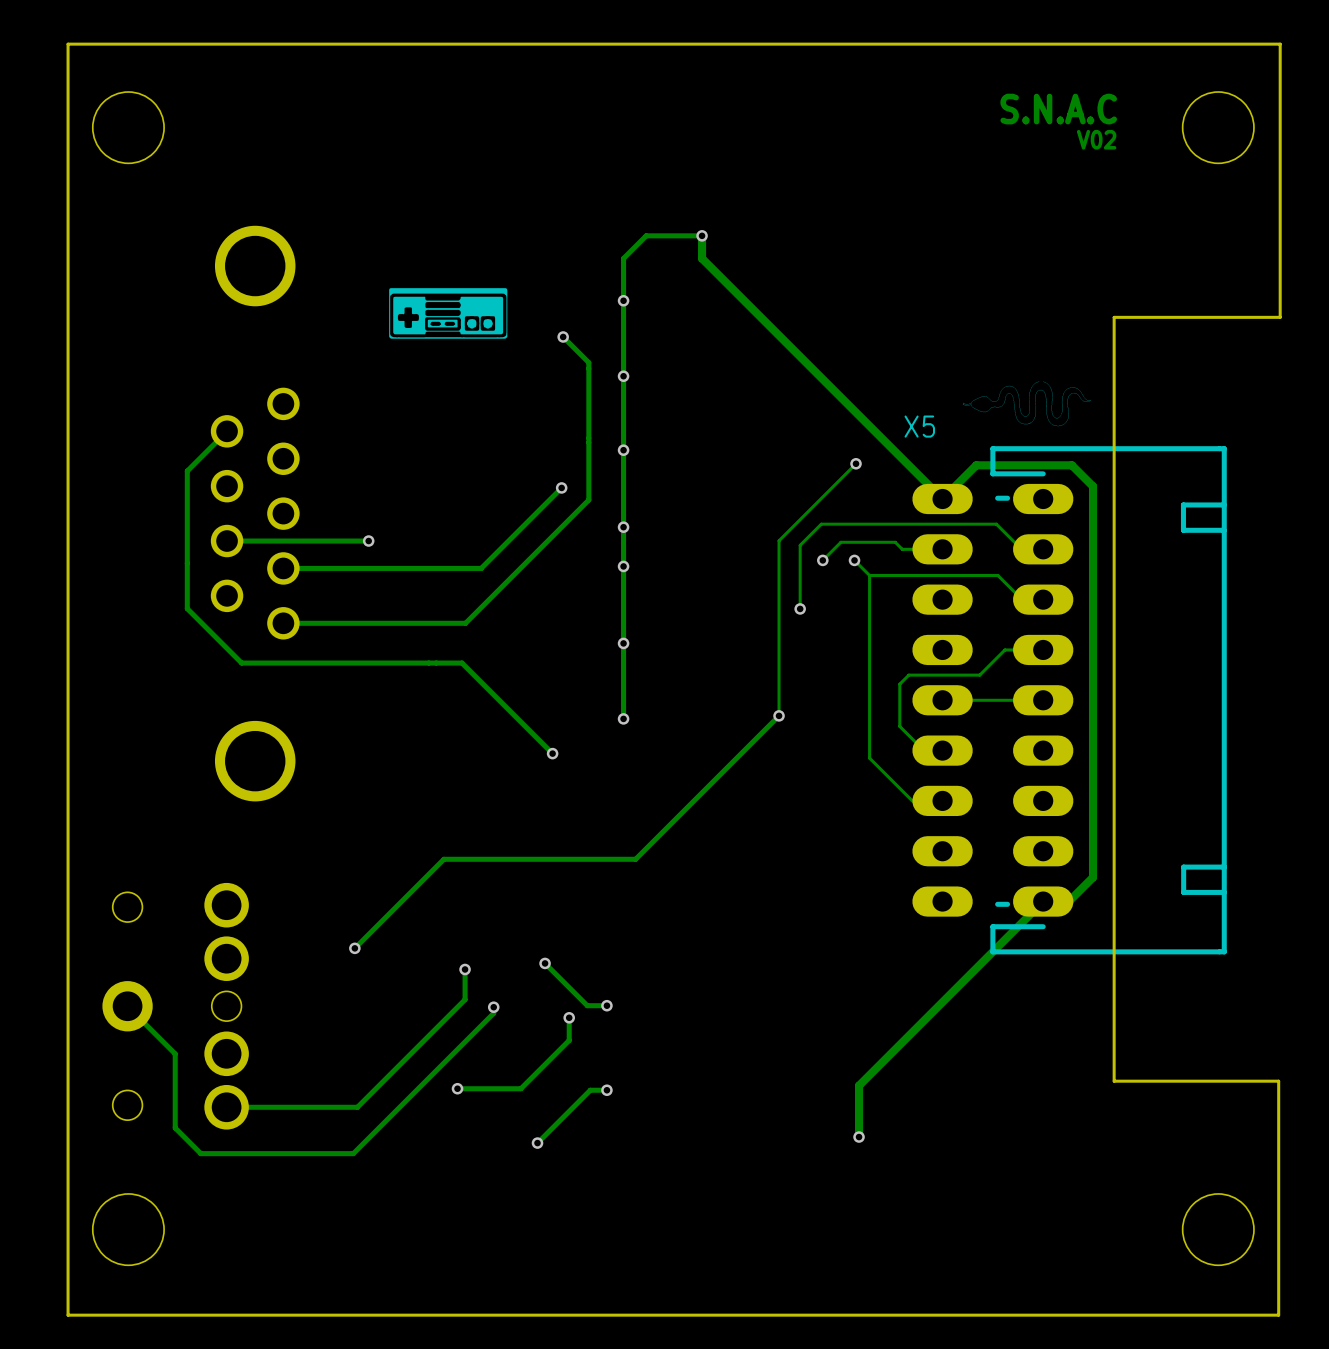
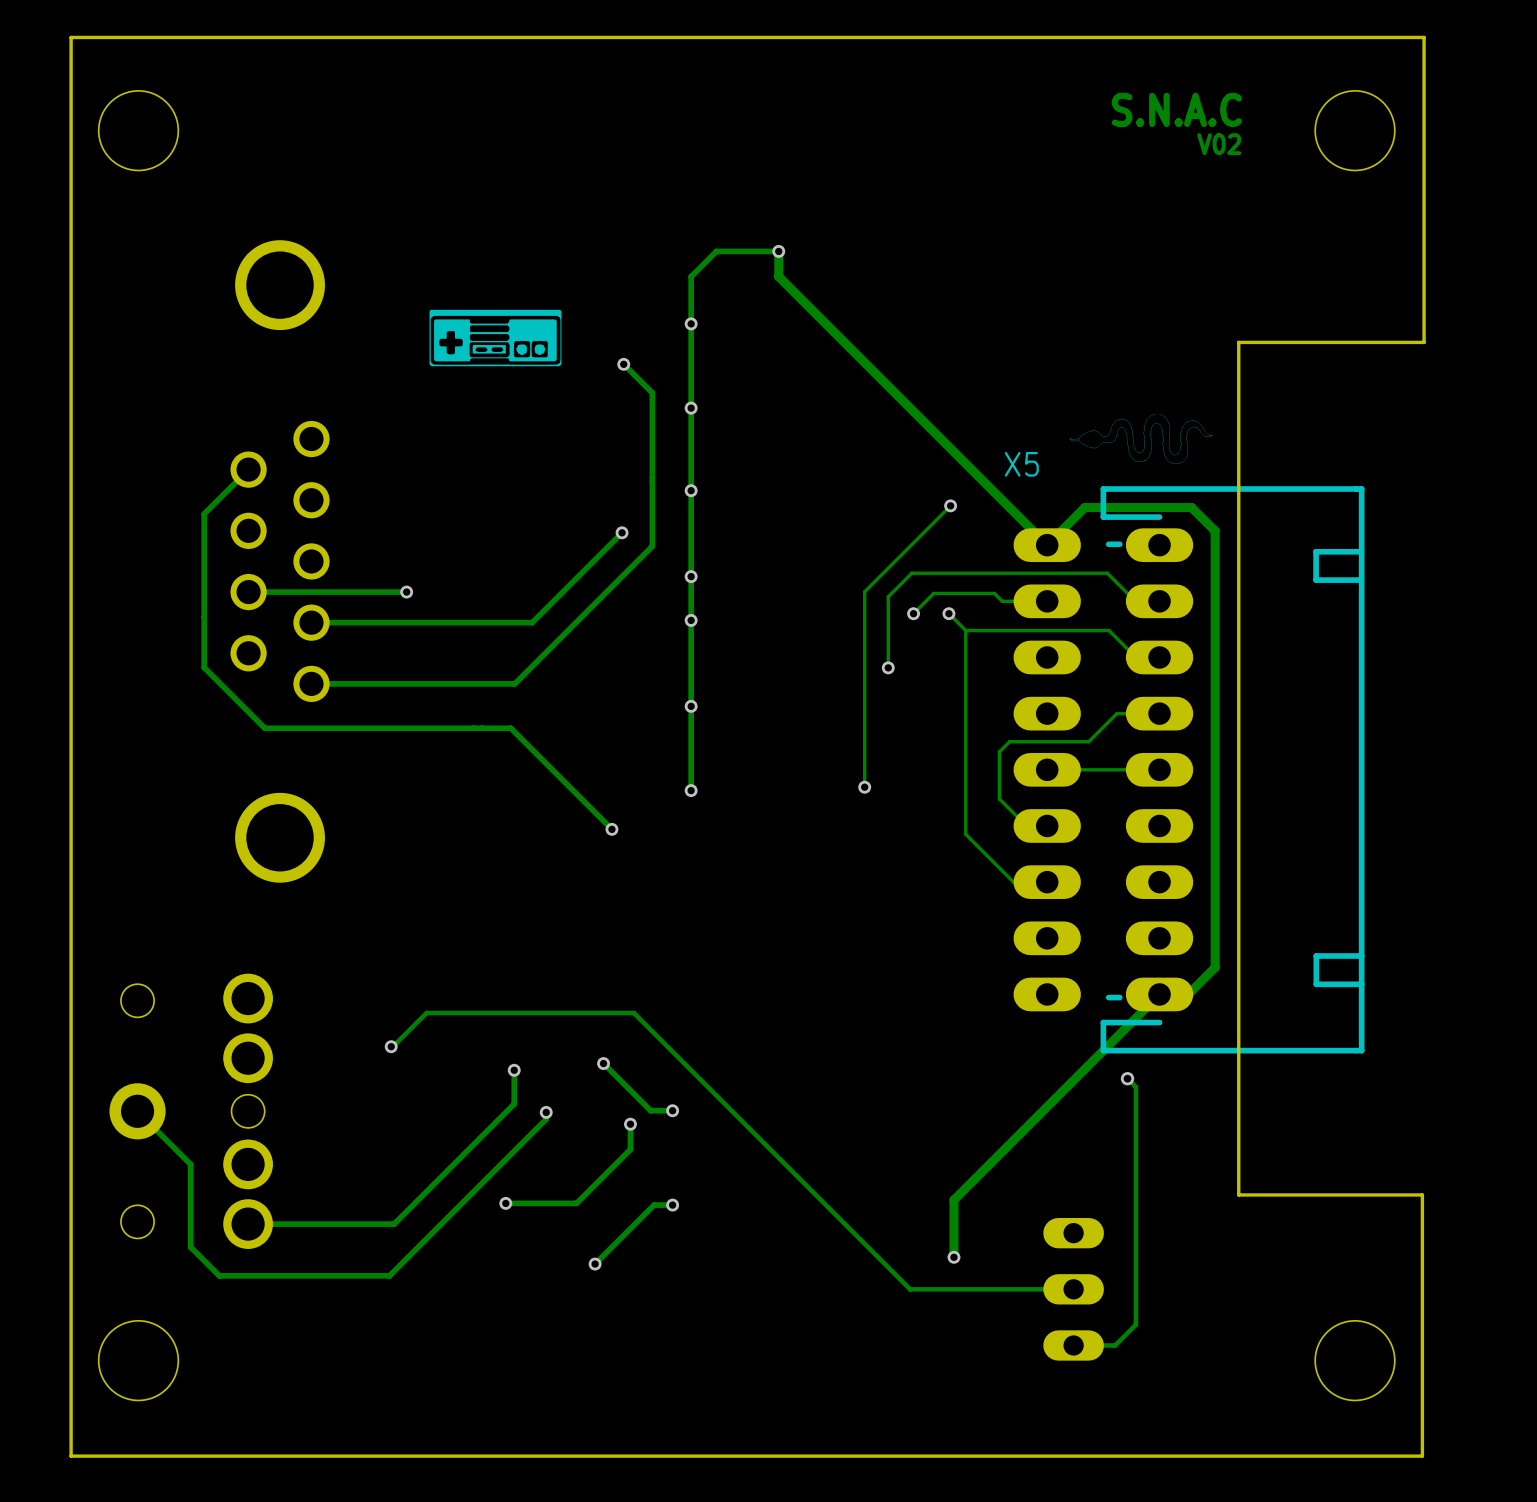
track: (779, 715) (635, 859) (443, 859) (354, 948) -> none
track: none -> (394, 1045) (426, 1013) (633, 1013) (910, 1289) (1073, 1289)
track: none -> (1127, 1078) (1135, 1087) (1135, 1324) (1115, 1345) (1073, 1345)
via: none -> (1127, 1078)
part: none -> (1073, 1289)

